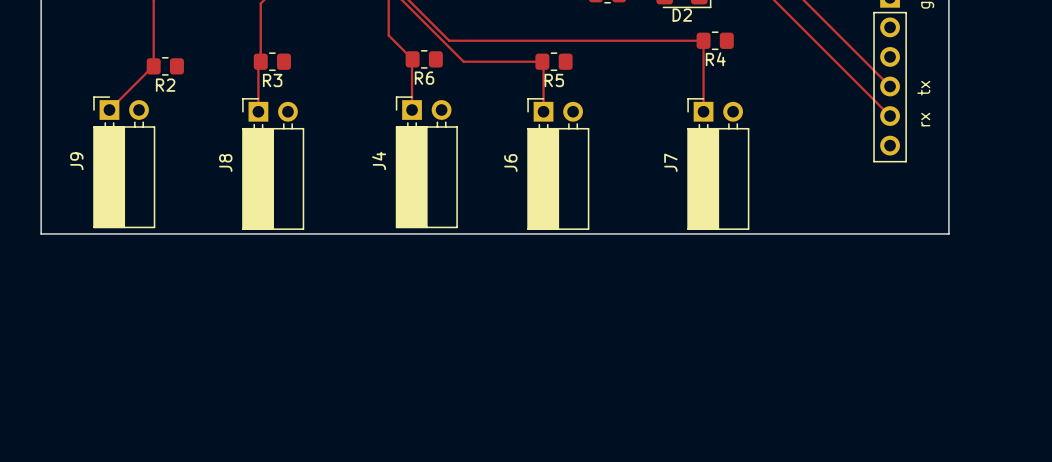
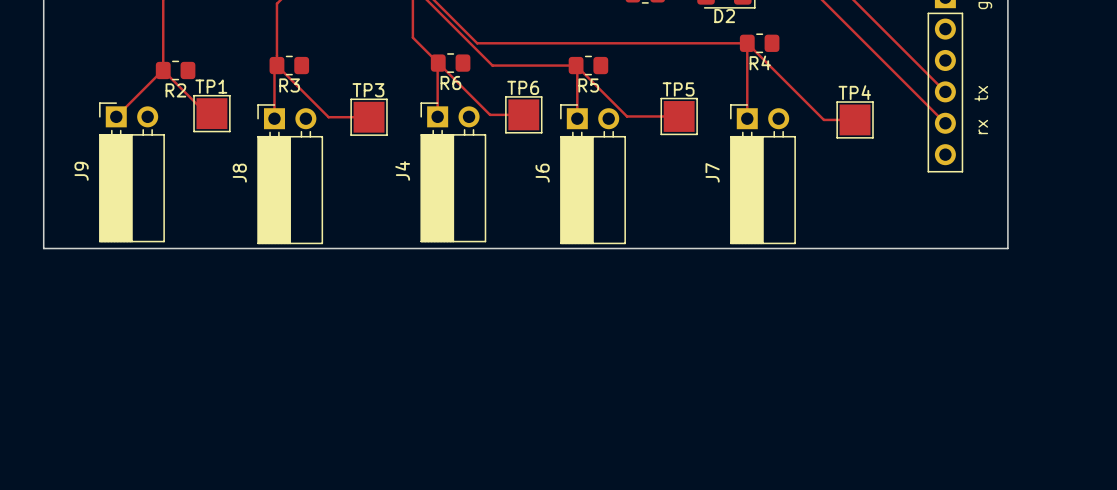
track: none -> (747, 43) (823, 119) (855, 119)
track: none -> (438, 63) (490, 114) (523, 114)
track: none -> (276, 65) (328, 117) (369, 117)
track: none -> (577, 66) (627, 116) (679, 116)
track: none -> (163, 70) (206, 113) (211, 113)
TP1: none -> (211, 113)
TP6: none -> (523, 114)
TP5: none -> (679, 116)
TP3: none -> (369, 117)
TP4: none -> (855, 119)

